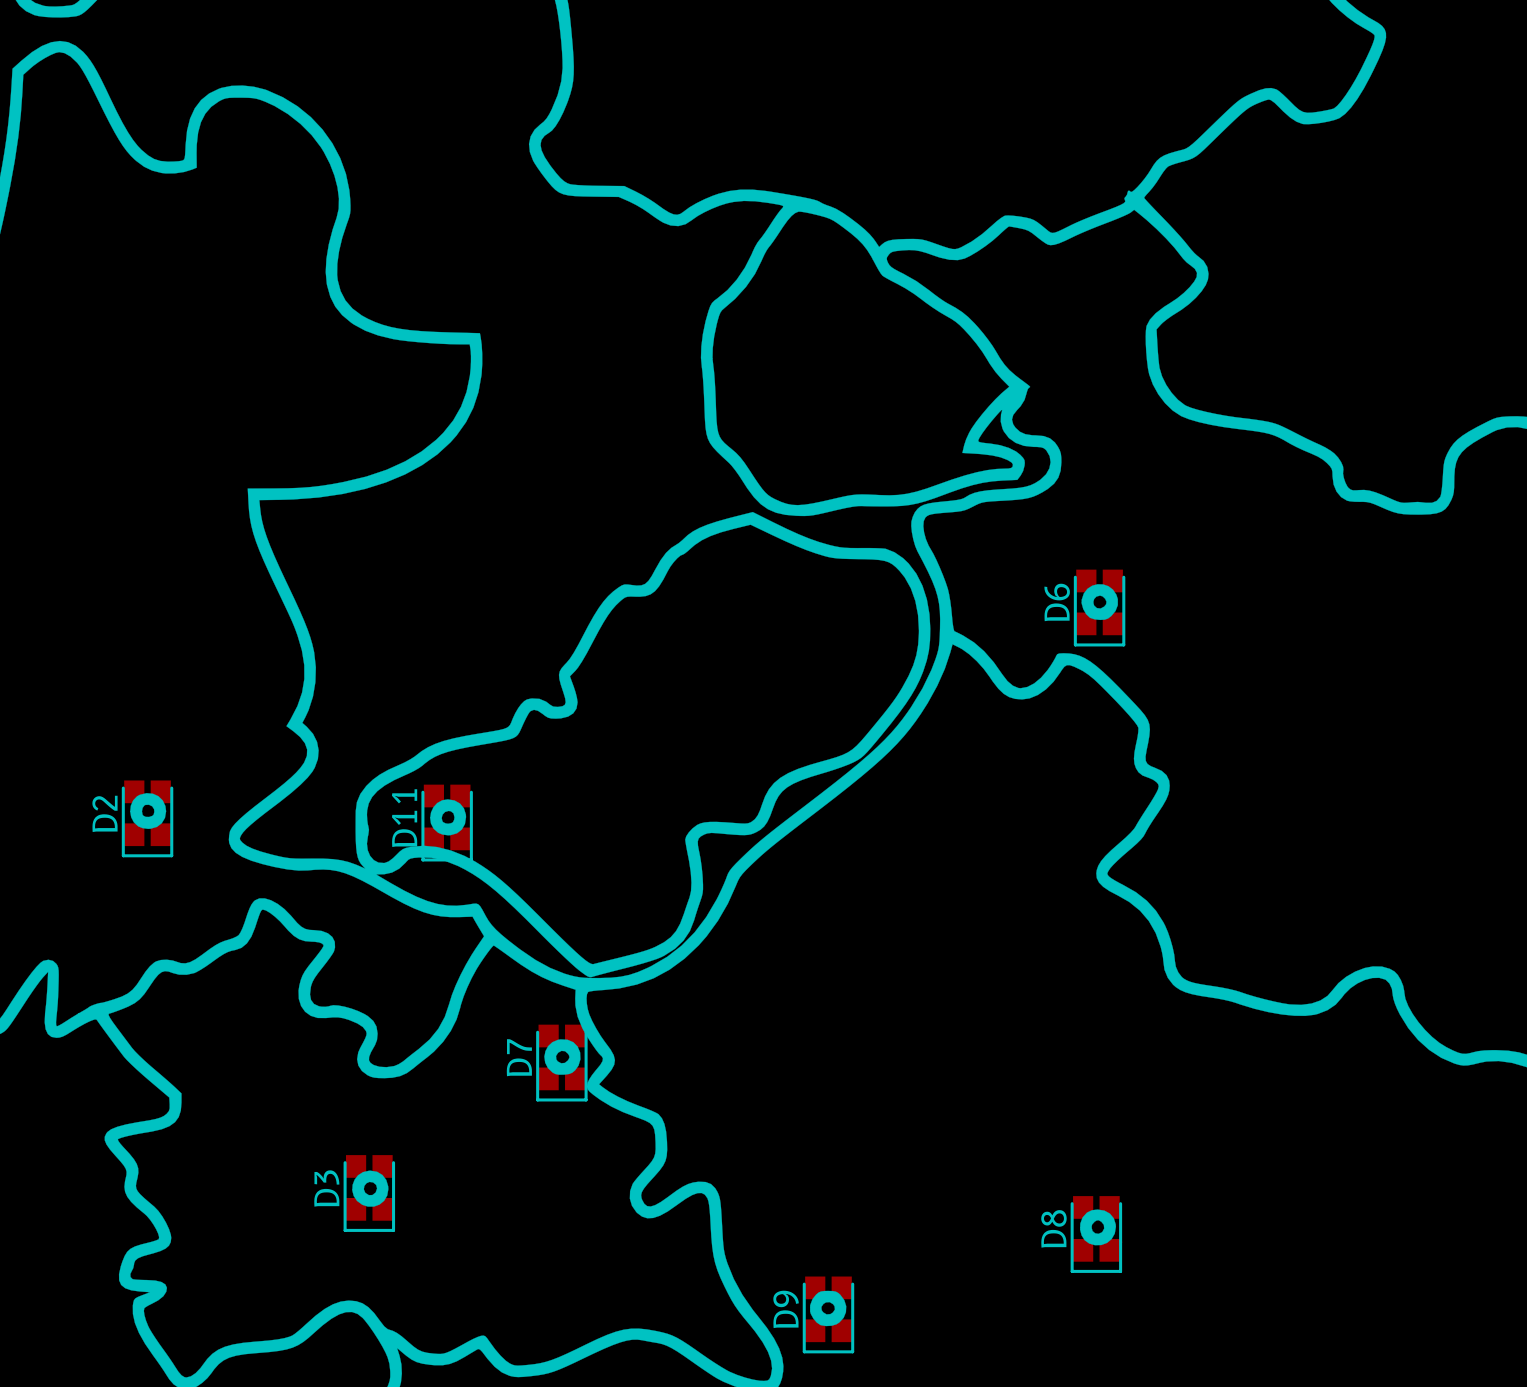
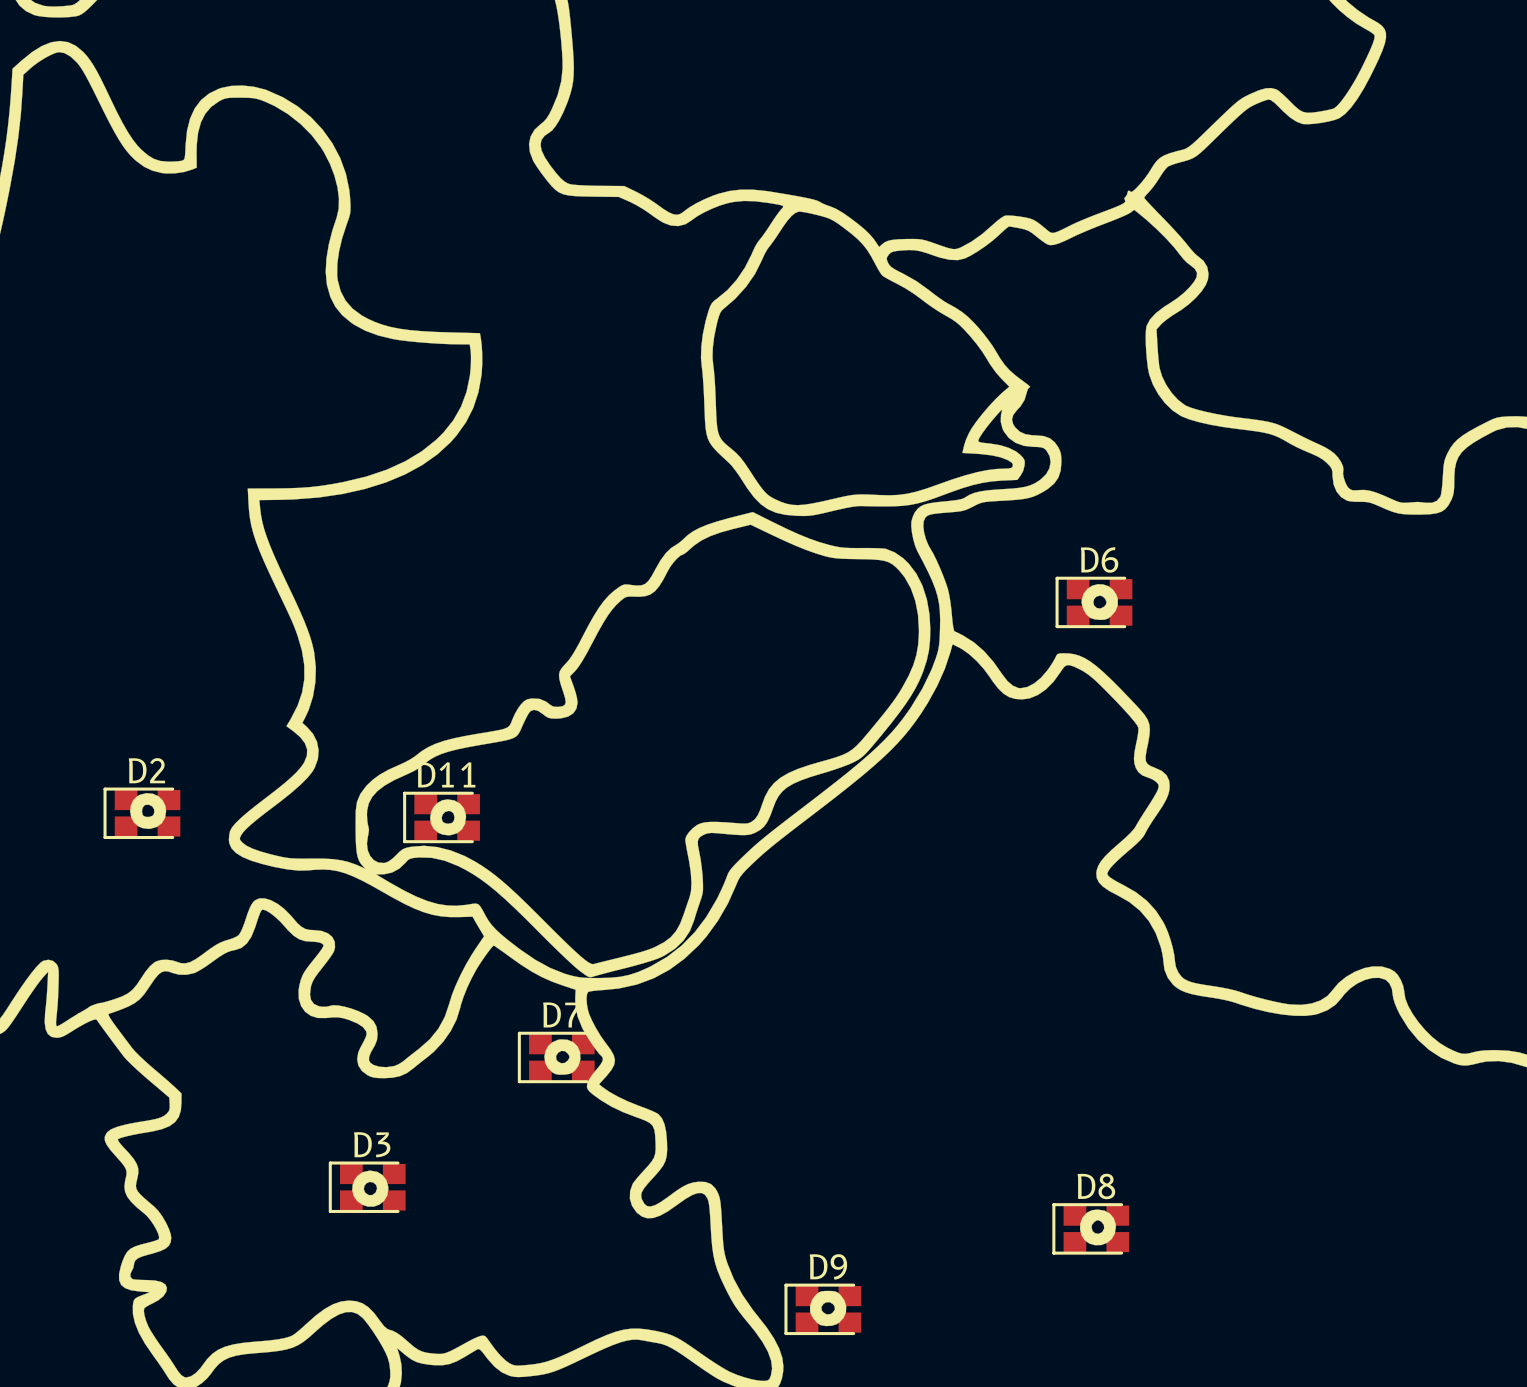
D6 rotation: 0° (1099, 608) -> 90° clockwise (1093, 602)
D2 rotation: 0° (147, 818) -> 90° clockwise (141, 813)
D11 rotation: 0° (447, 823) -> 90° clockwise (441, 817)
D7 rotation: 0° (561, 1063) -> 90° clockwise (556, 1057)
D3 rotation: 0° (369, 1193) -> 90° clockwise (367, 1187)
D8 rotation: 0° (1096, 1234) -> 90° clockwise (1090, 1228)
D9 rotation: 0° (828, 1314) -> 90° clockwise (822, 1309)

